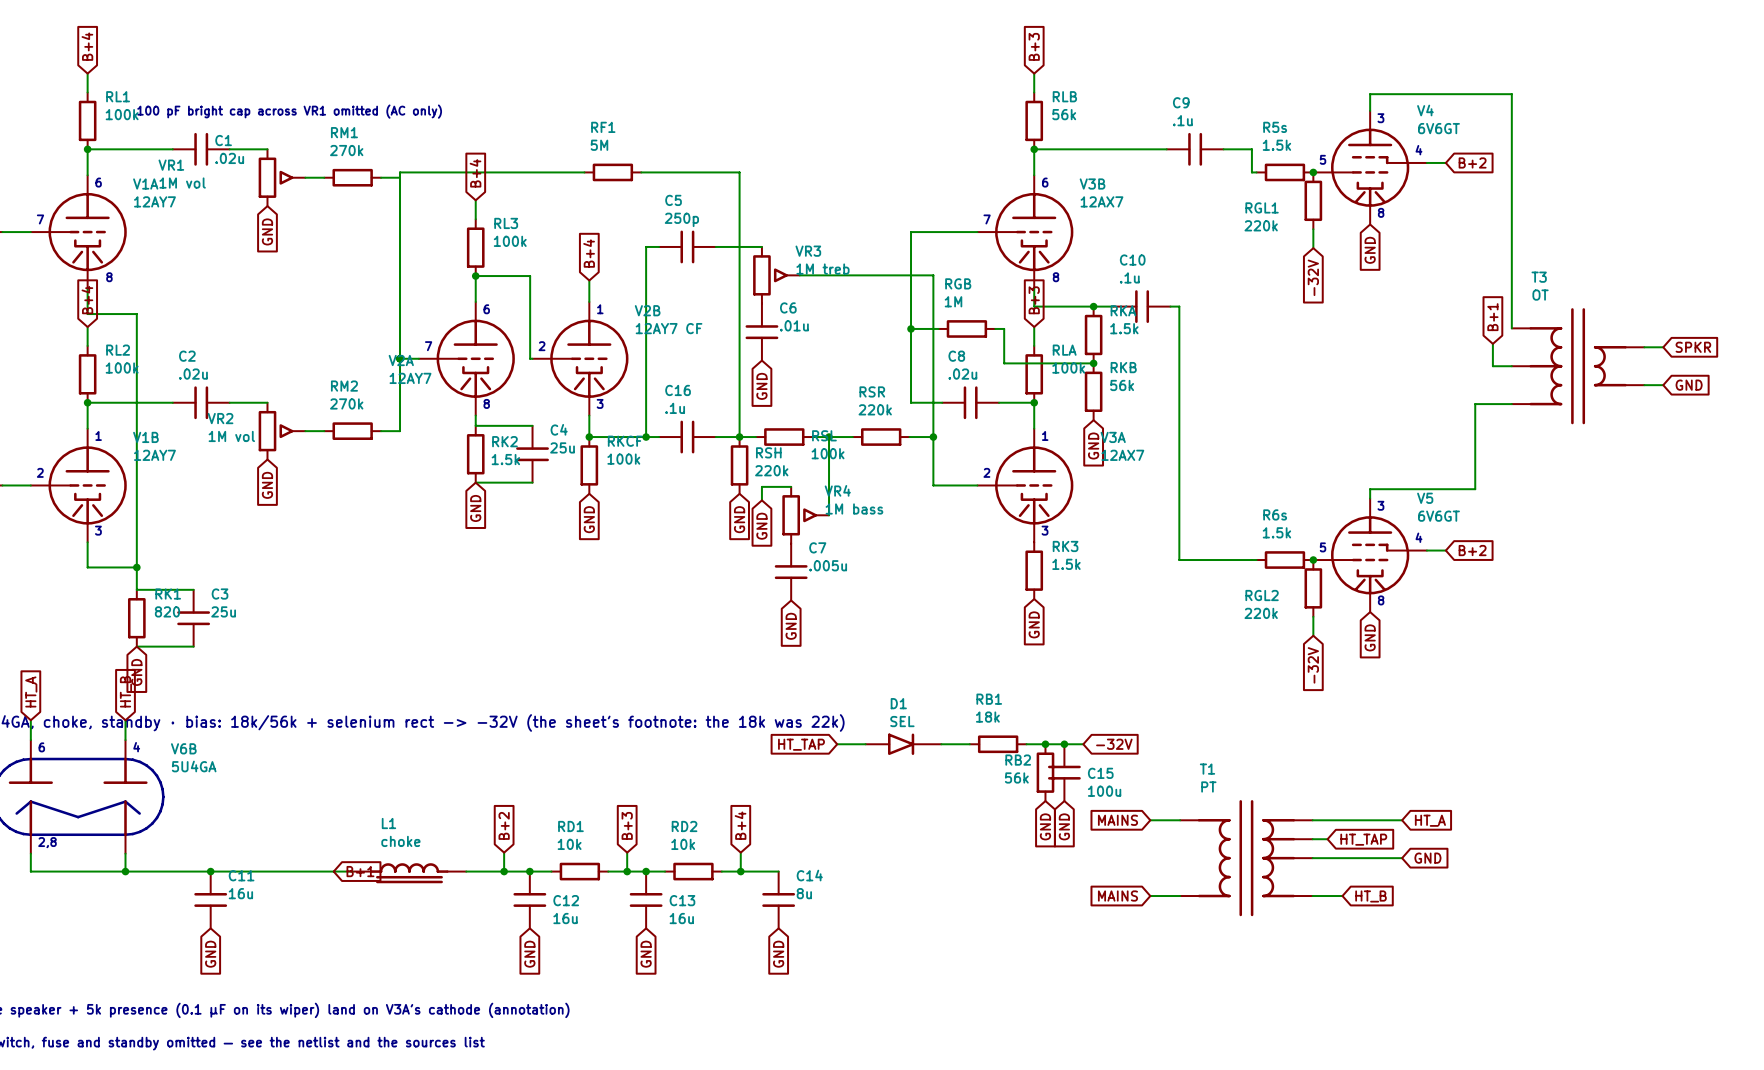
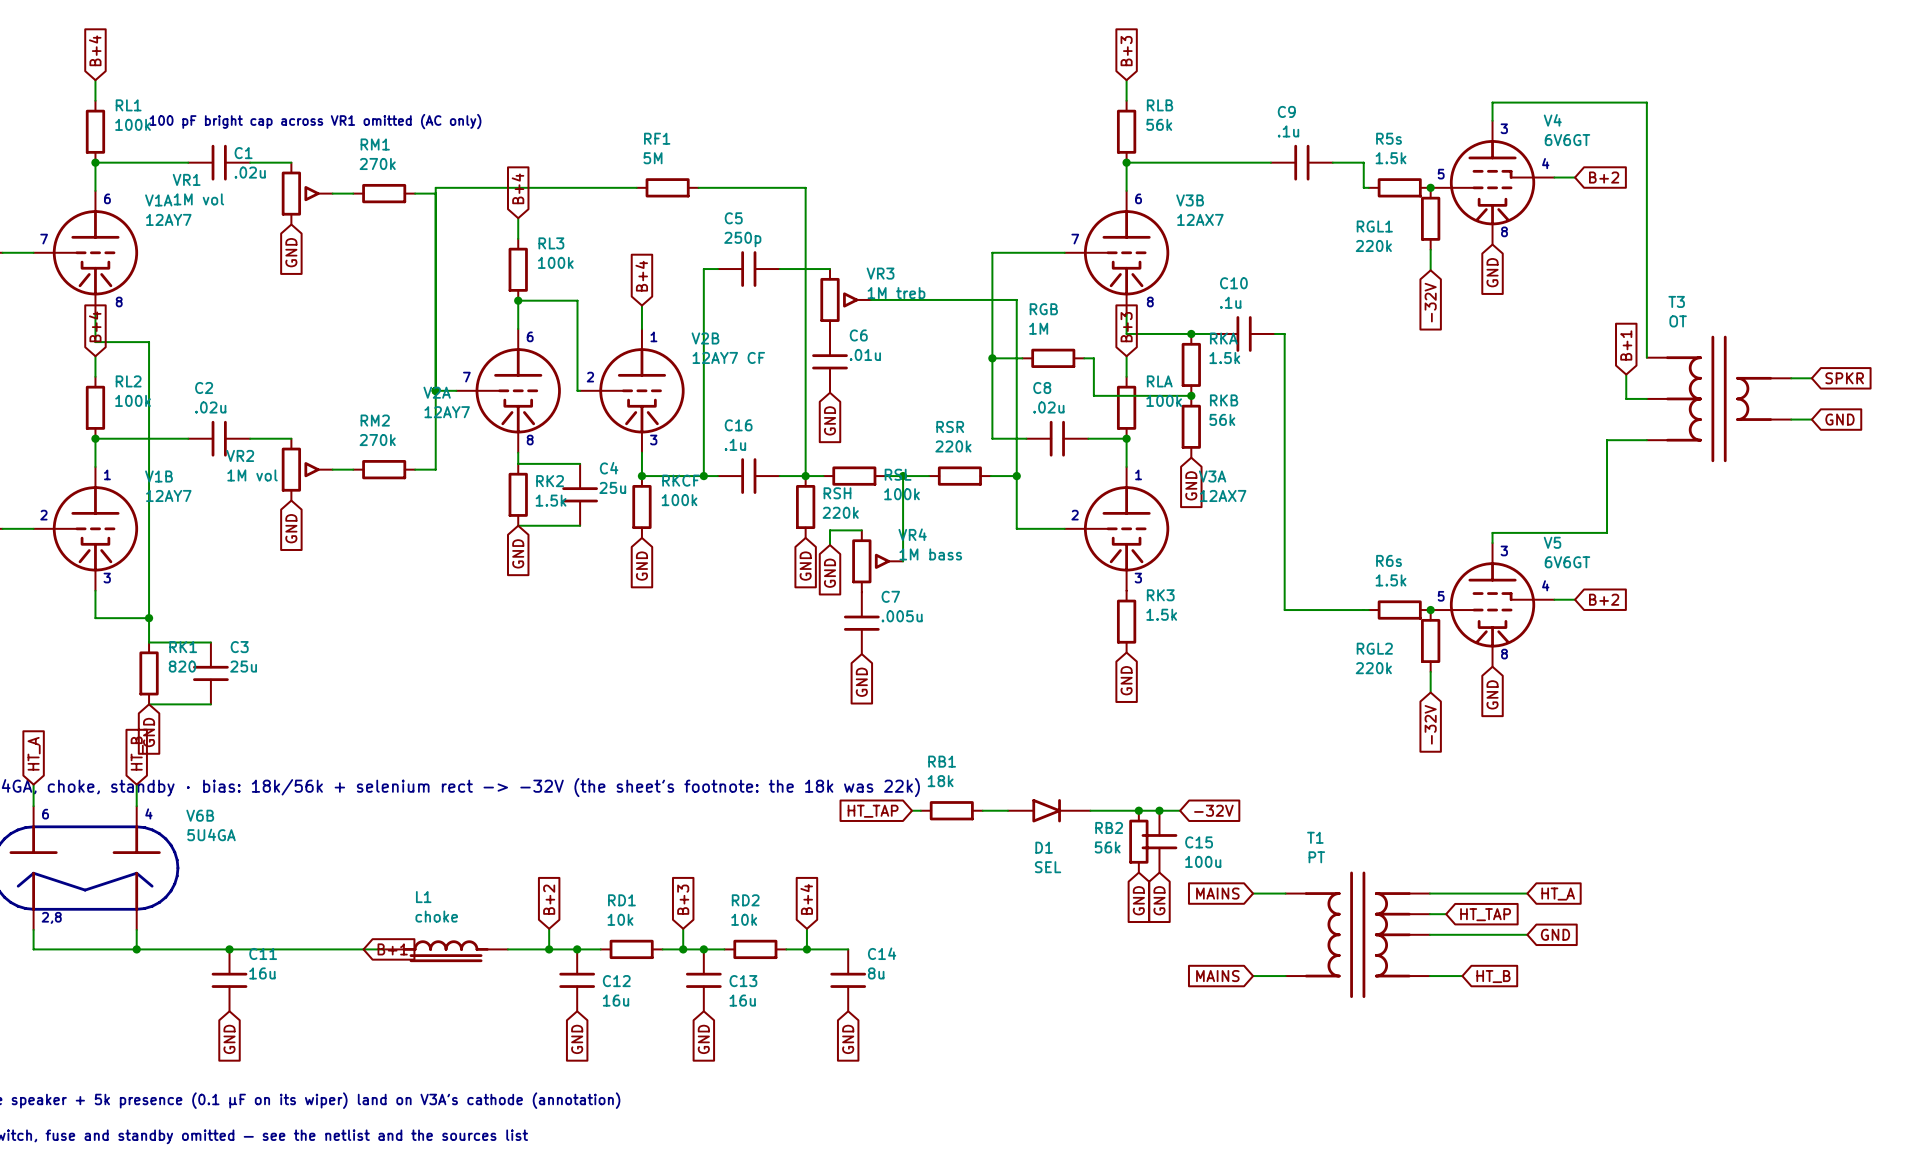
D1 name position: D1 (898, 703) -> D1 (1044, 847)
D1 value position: SEL (902, 721) -> SEL (1048, 867)
wire: (845, 744) (865, 744) -> none
D1 position: (903, 744) -> (1049, 810)
wire: (941, 744) (969, 744) -> none
RB1 position: (998, 744) -> (951, 810)
wire: none -> (1090, 810) (1118, 810)

